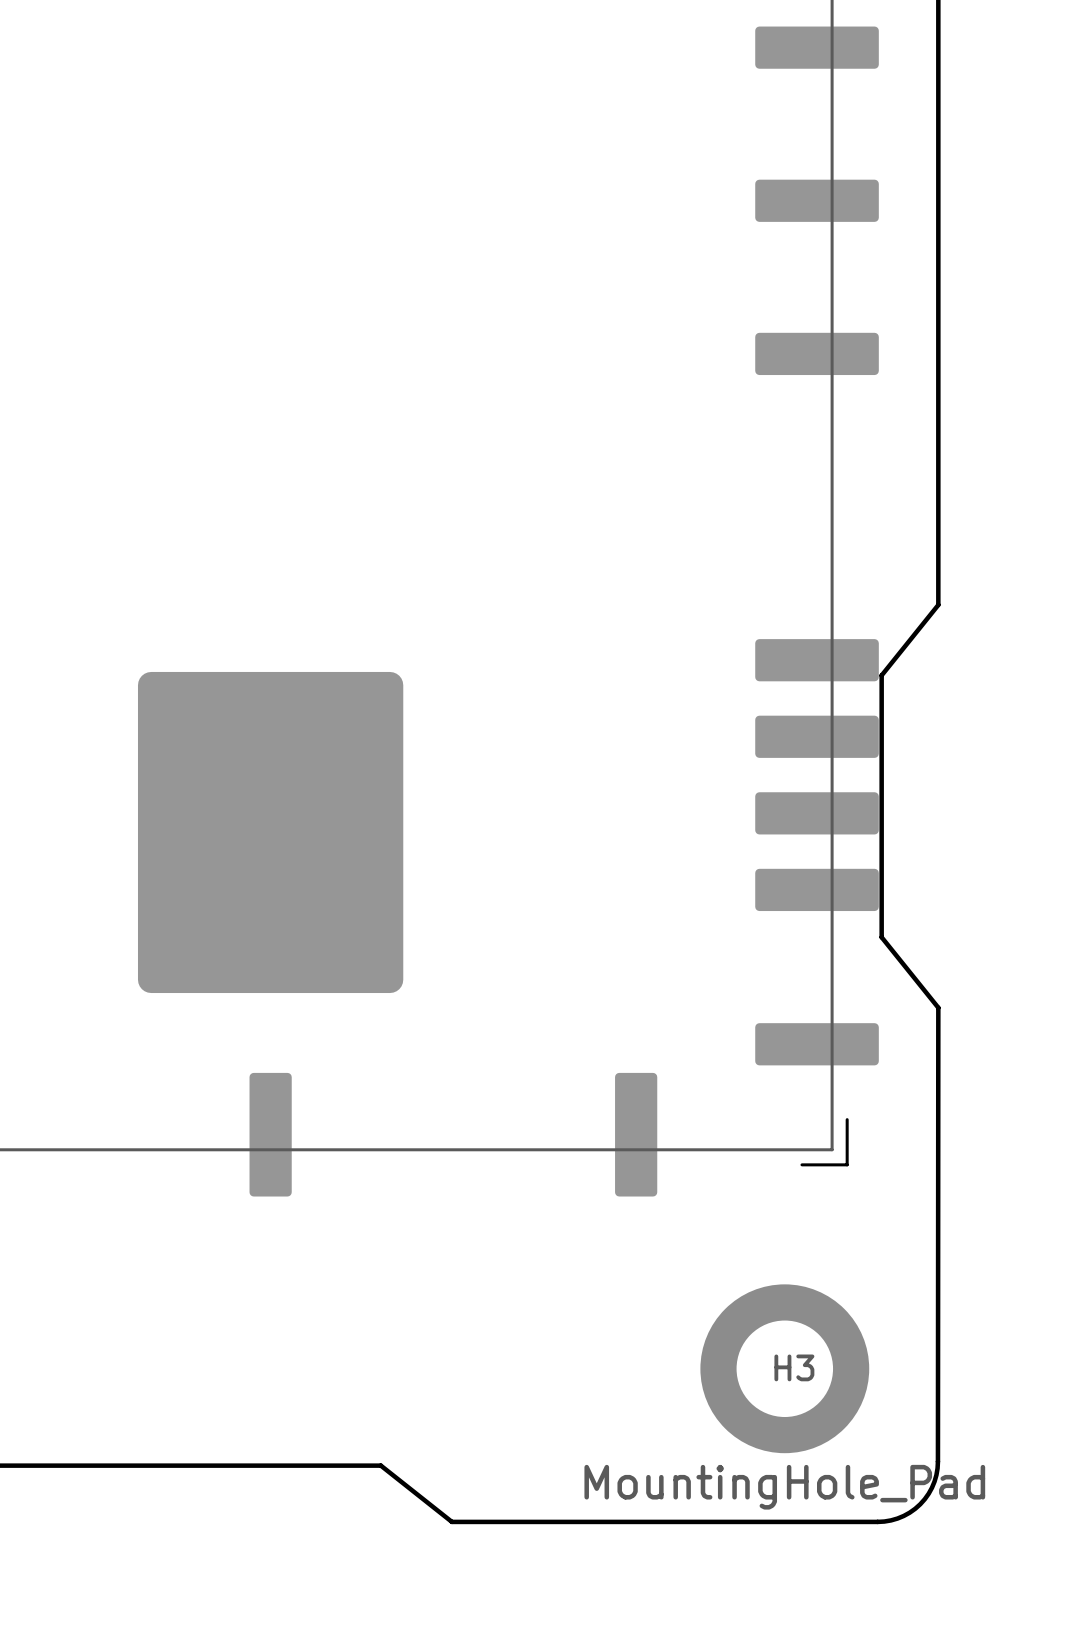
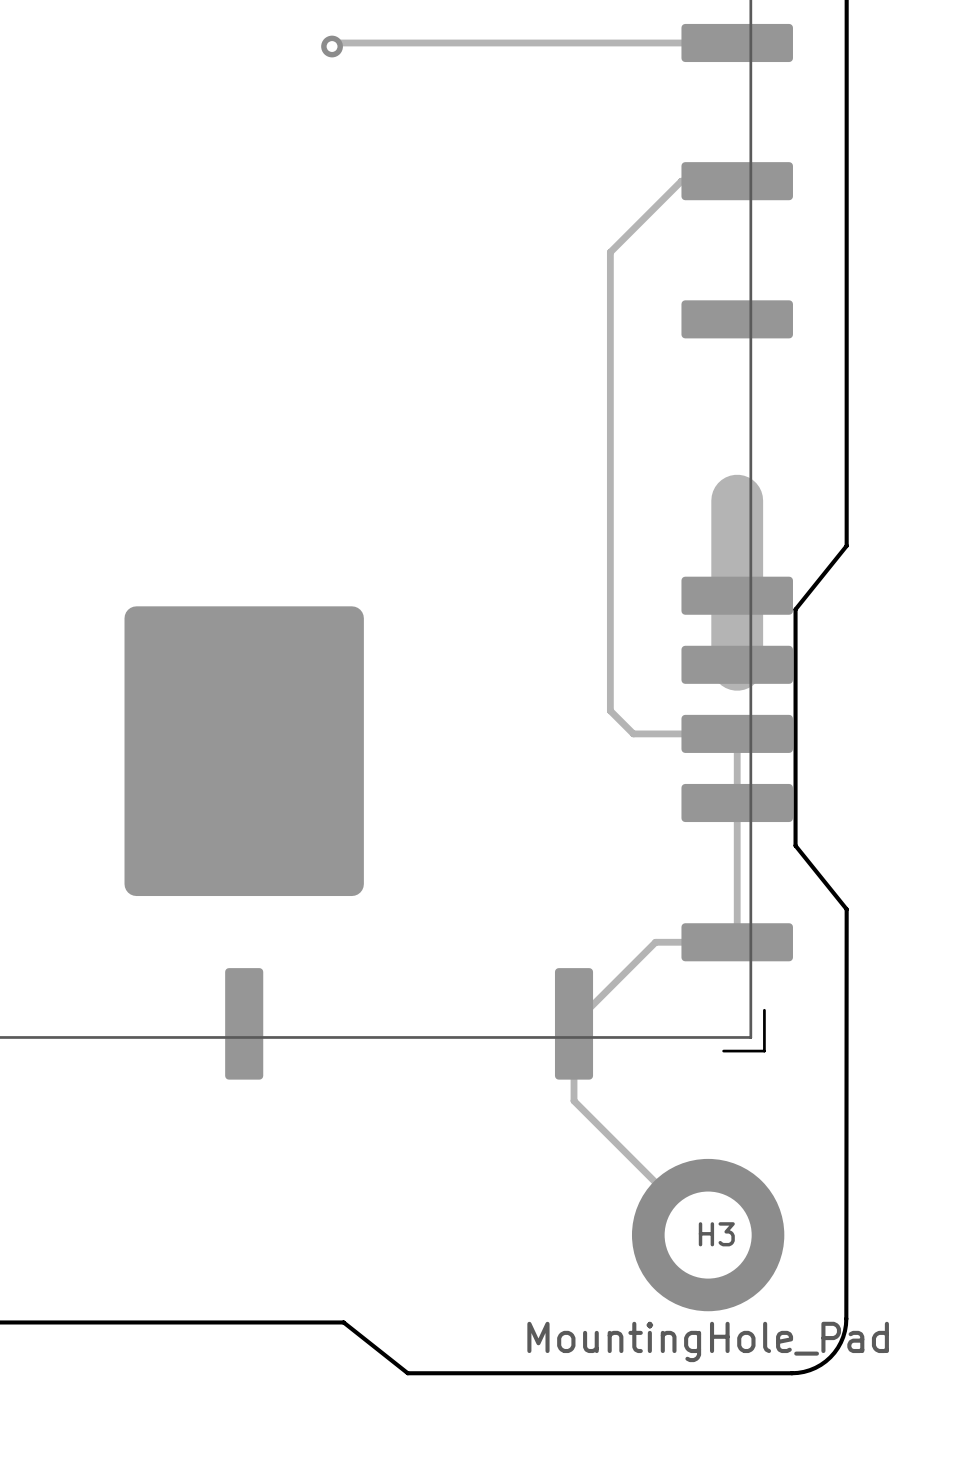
track: none -> (737, 42) (335, 42) (332, 46)
via: none -> (332, 46)
track: none -> (737, 181) (681, 181) (610, 252) (610, 710) (633, 733) (737, 733) (737, 942) (655, 942) (574, 1023) (574, 1100) (708, 1235)
track: none -> (734, 498) (737, 500) (737, 664)

